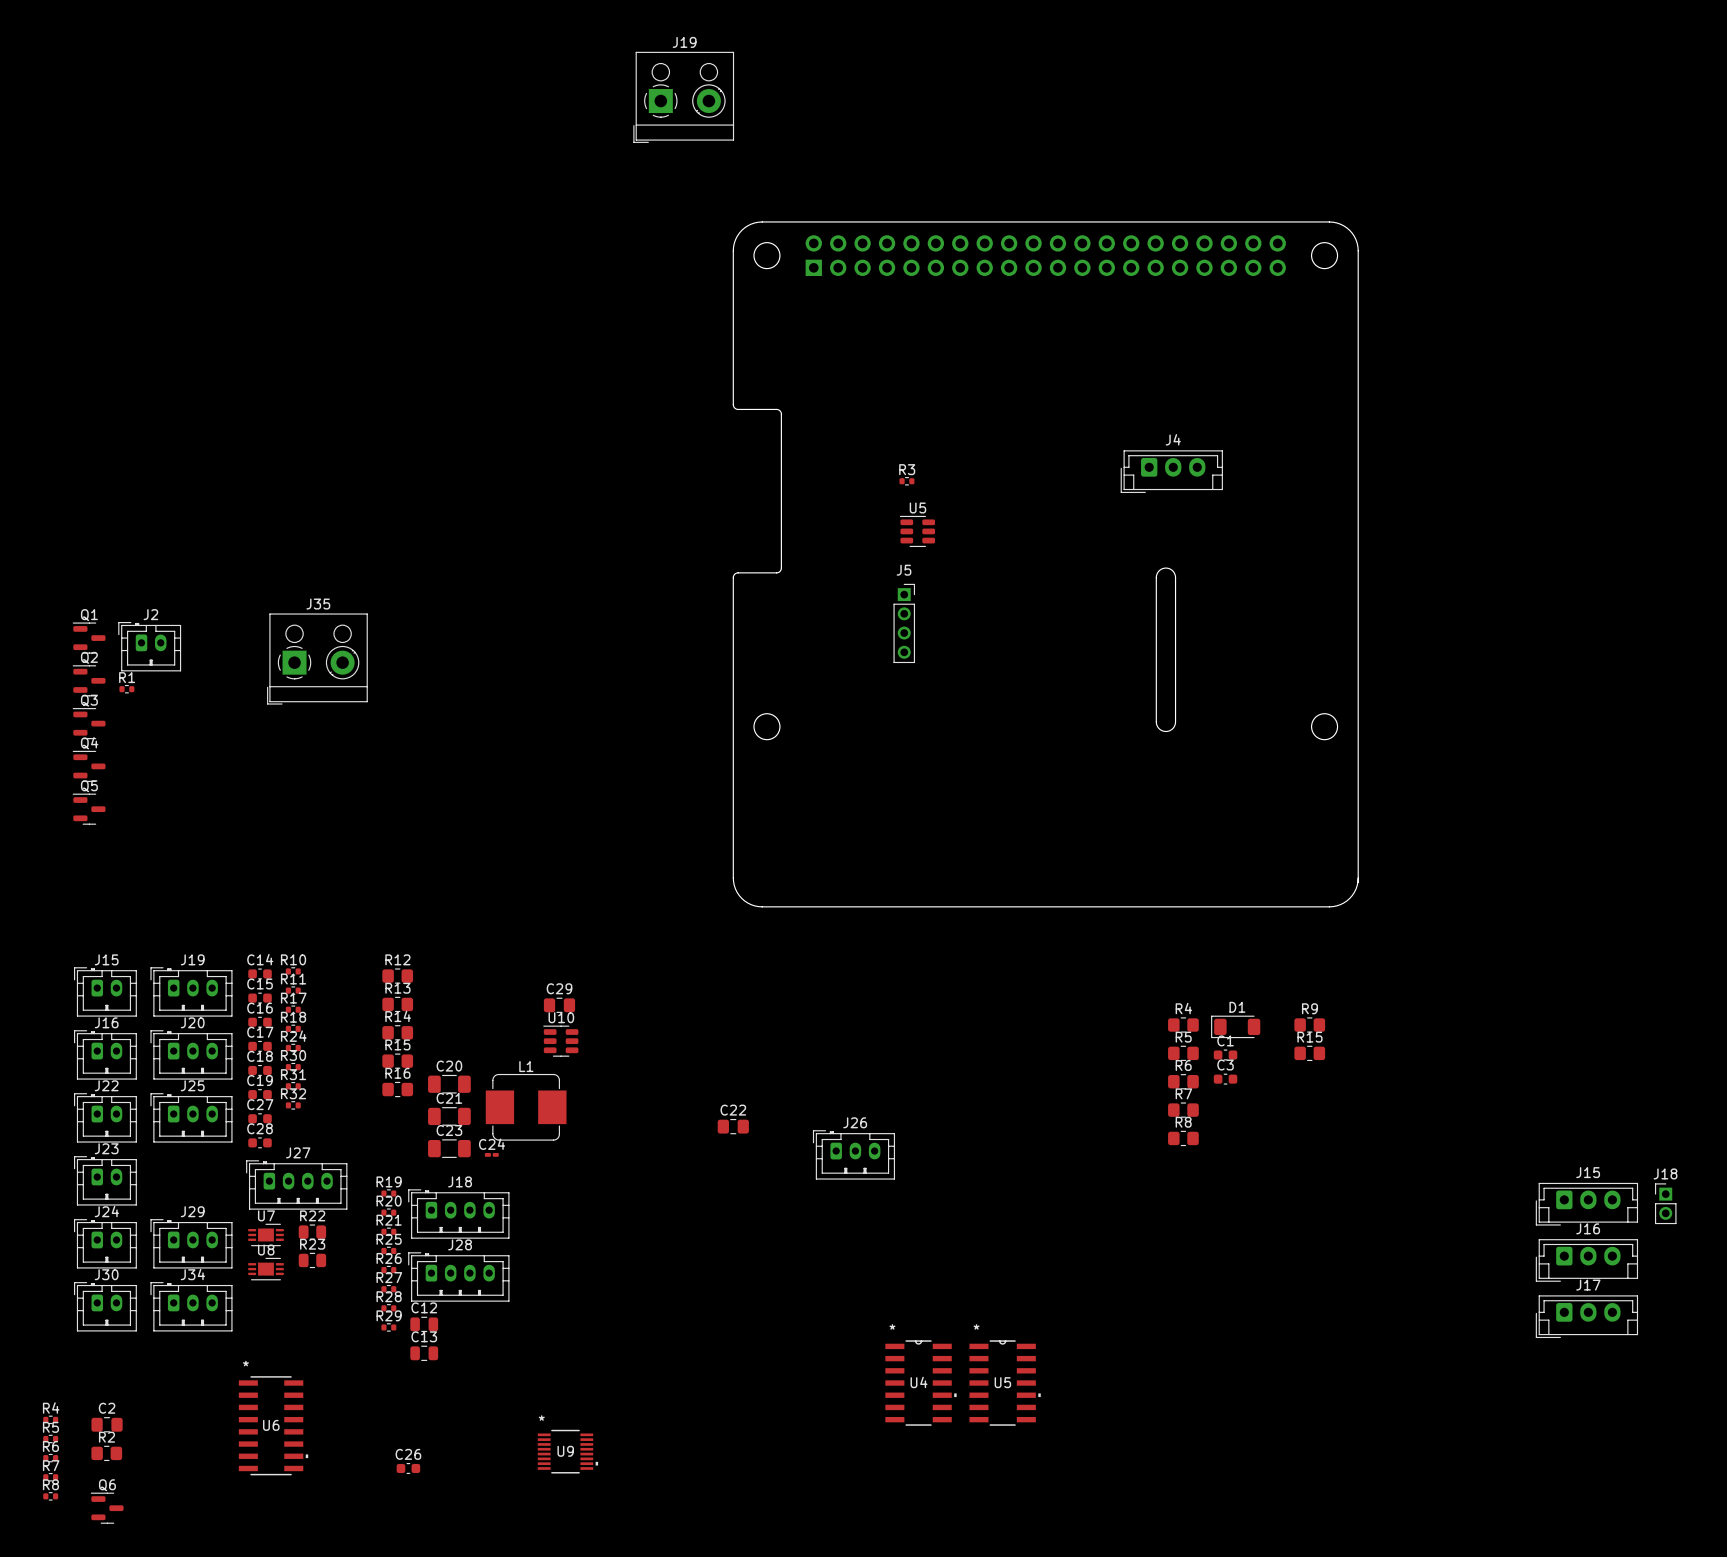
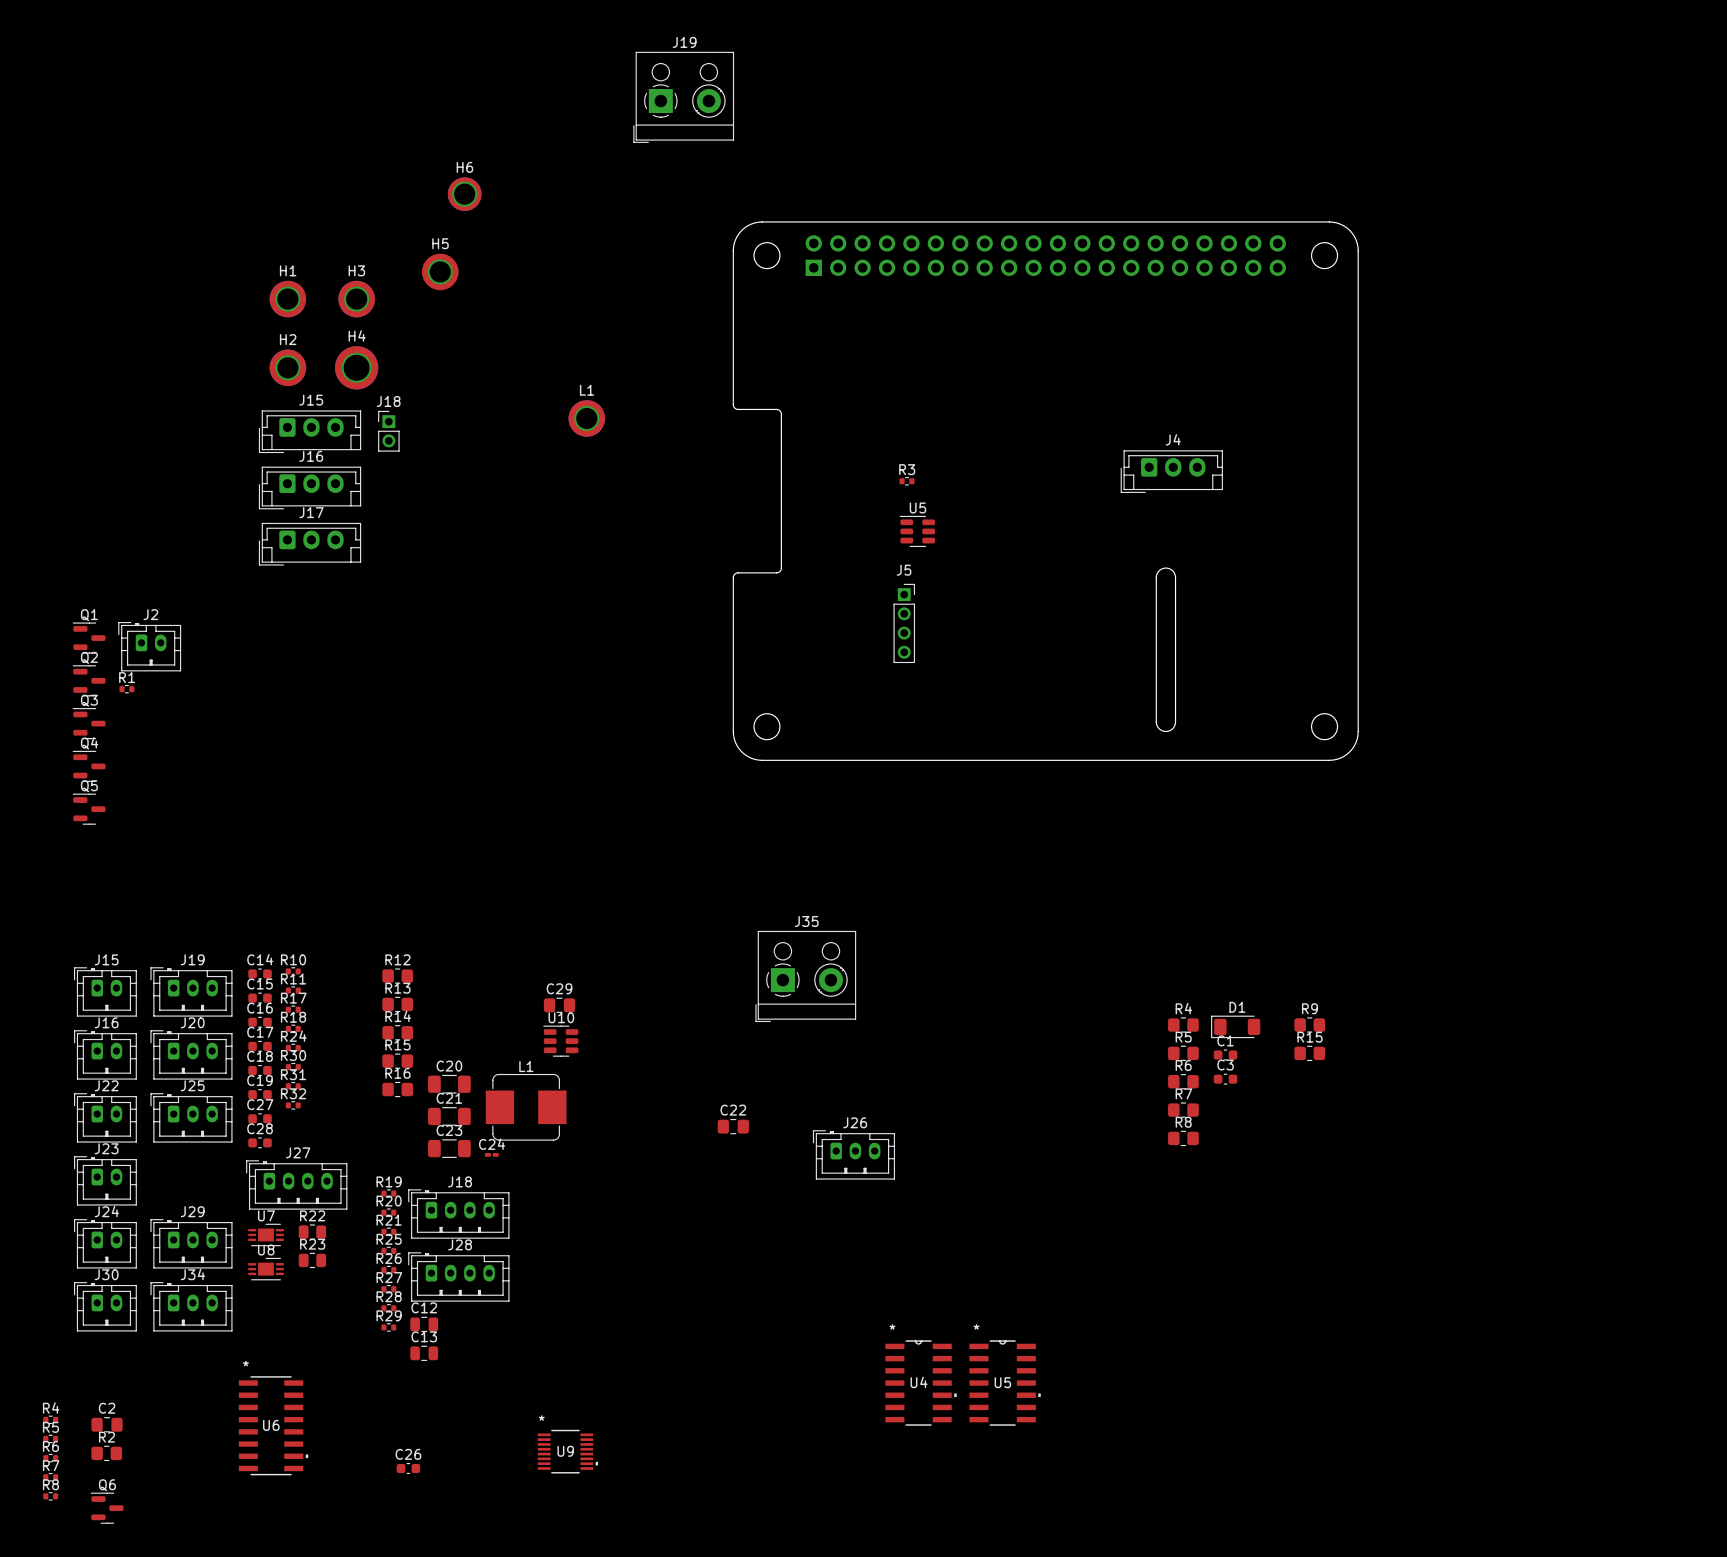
H6: none -> (464, 194)
H5: none -> (440, 271)
H1: none -> (287, 299)
H3: none -> (356, 299)
H2: none -> (287, 367)
H4: none -> (356, 367)
L1: none -> (586, 418)
J15: none -> (310, 431)
J18: none -> (388, 431)
J16: none -> (310, 487)
J35 position: (317, 659) -> (805, 976)
board edge: (733, 731) (733, 881) (741, 898) (754, 905) (1329, 906) (1340, 904) (1349, 898) (1356, 889) (1358, 878) -> (733, 731) (735, 742) (741, 751) (751, 758) (762, 760) (1329, 760) (1340, 758) (1349, 751) (1356, 742) (1358, 731)
board edge: (1358, 731) (1358, 882) -> none
J18: (1665, 1203) -> none
J15: (1586, 1204) -> none
J16: (1586, 1260) -> none
J17 position: (1586, 1316) -> (310, 544)

